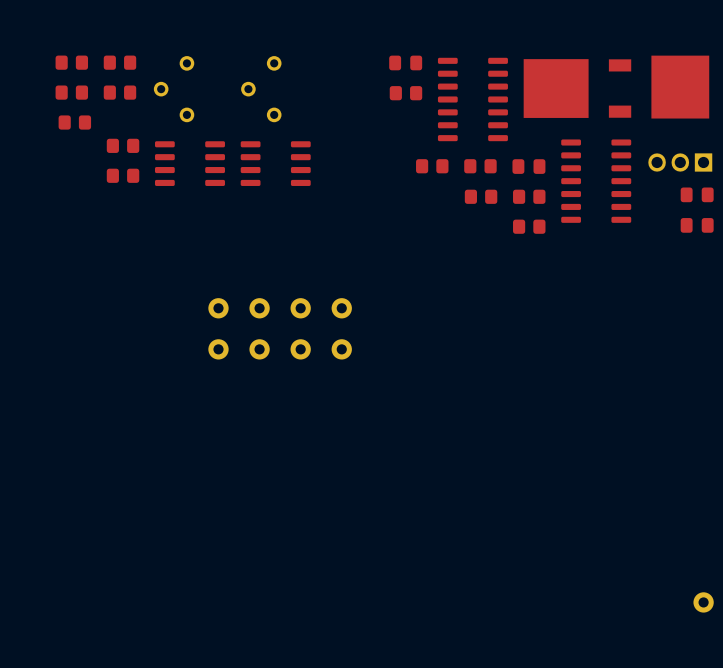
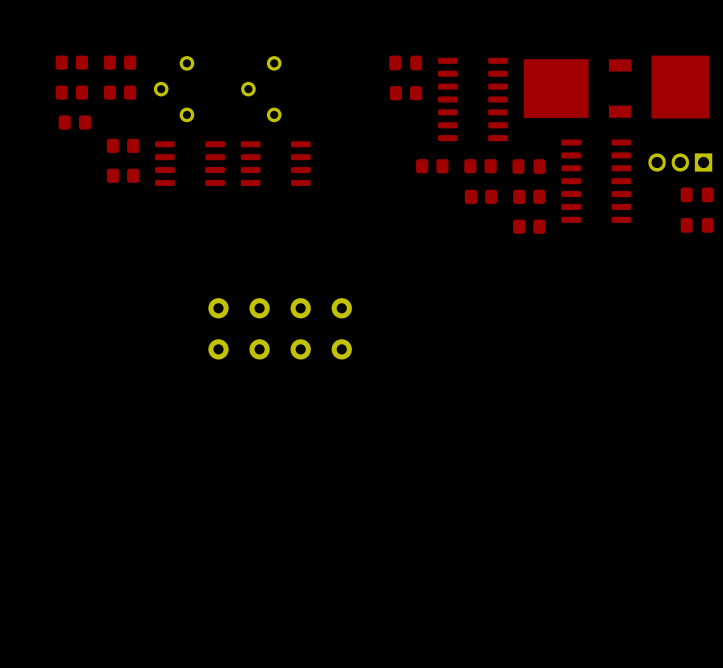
part: (703, 602) -> none

